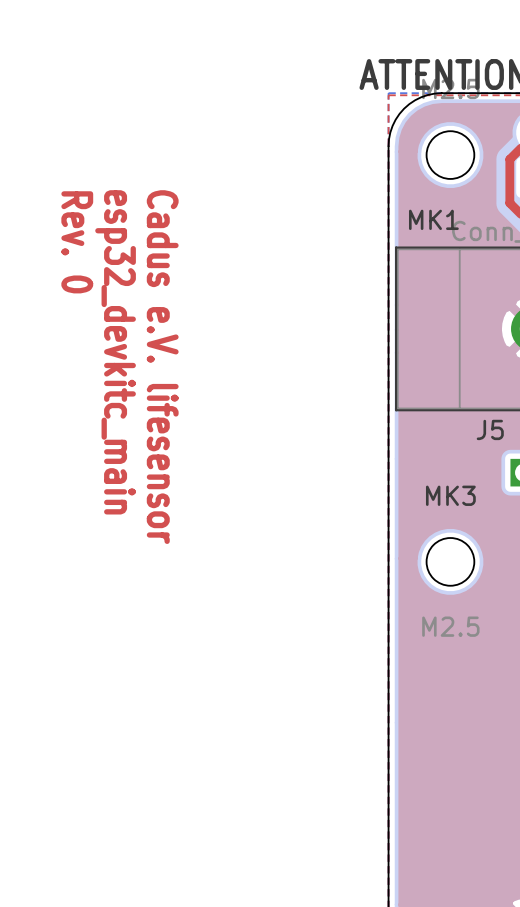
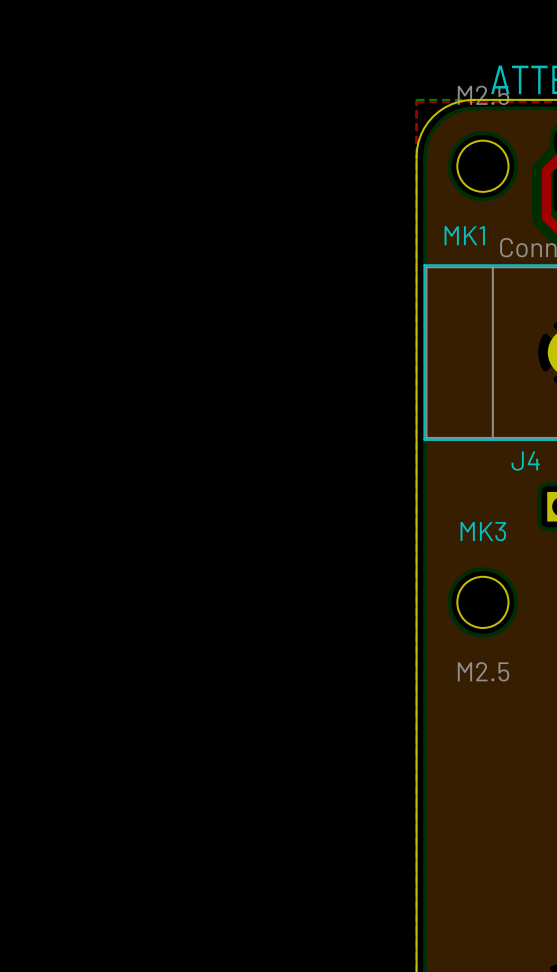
text: Rev. 0 (77, 242) -> none
text: esp32_devkitc_main (115, 352) -> none
text: Cadus e.V. lifesensor (162, 367) -> none
J5 name: J5 (490, 429) -> J4 (525, 461)

